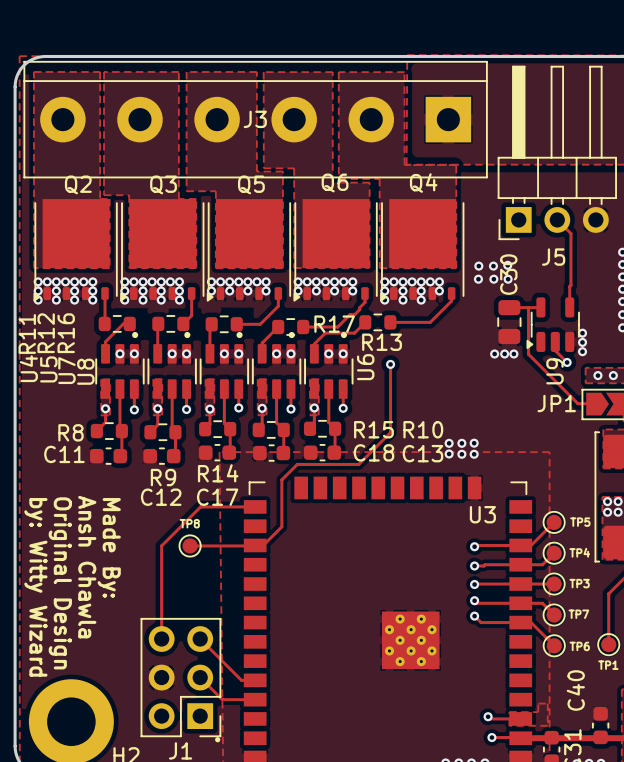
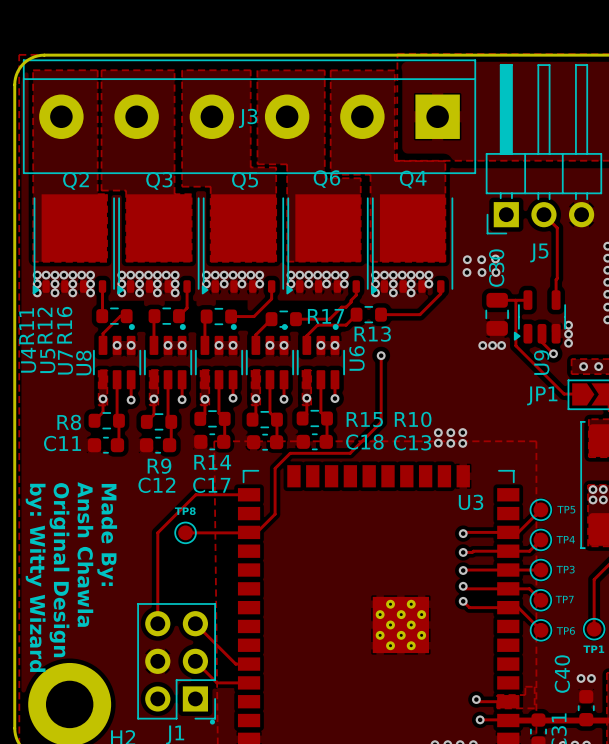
via: none -> (581, 678)
via: none -> (591, 678)

